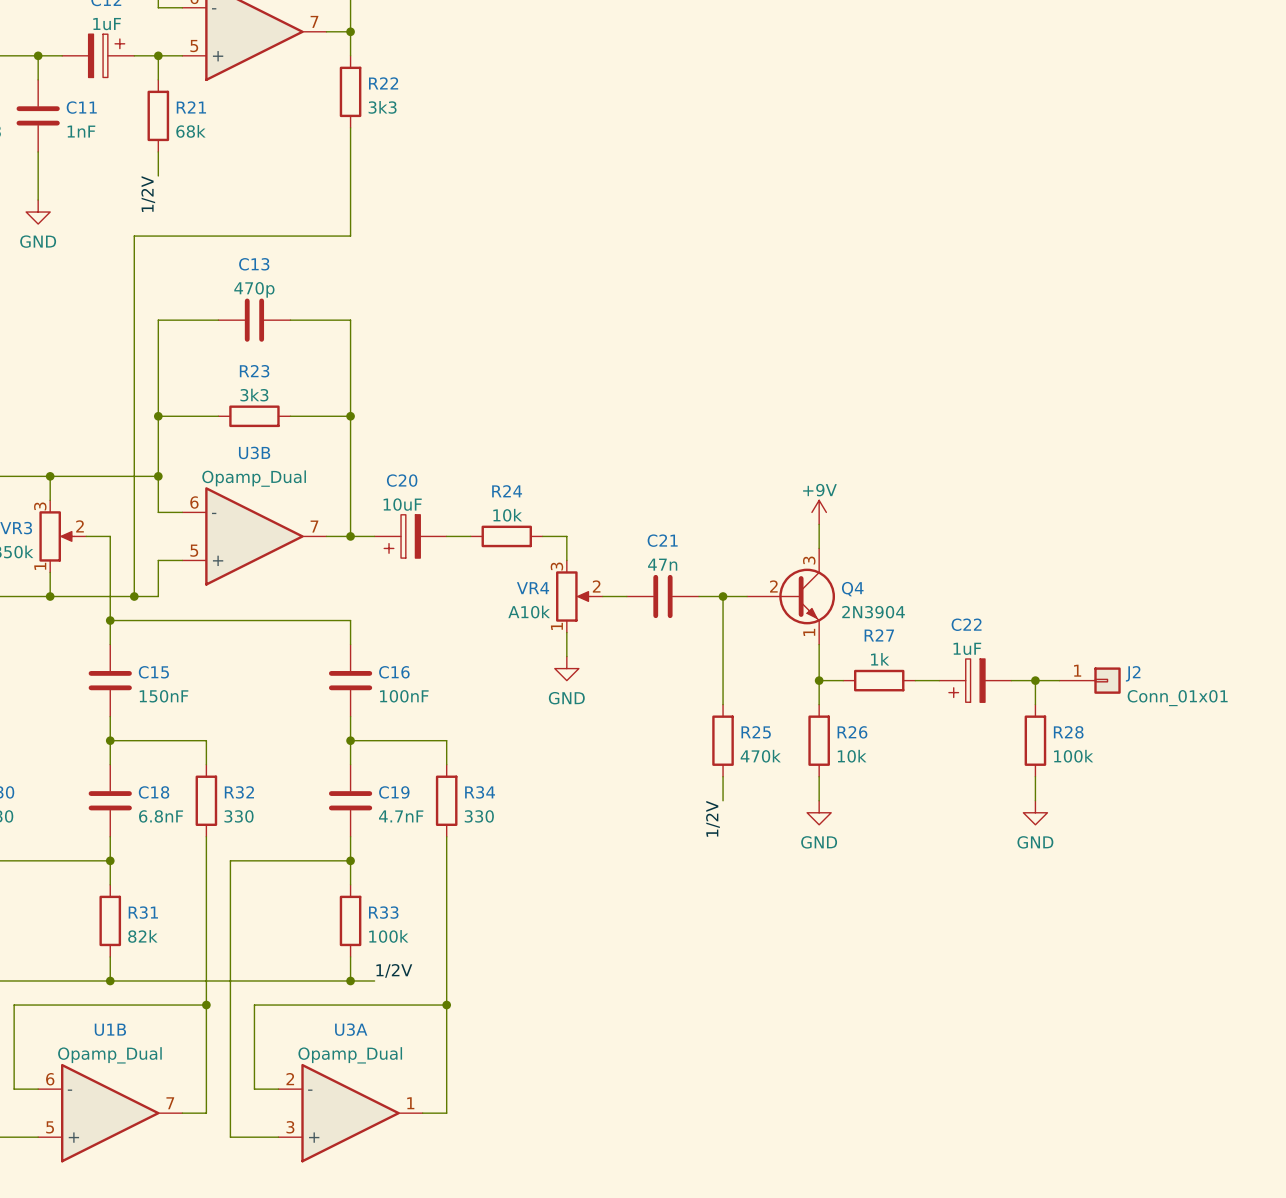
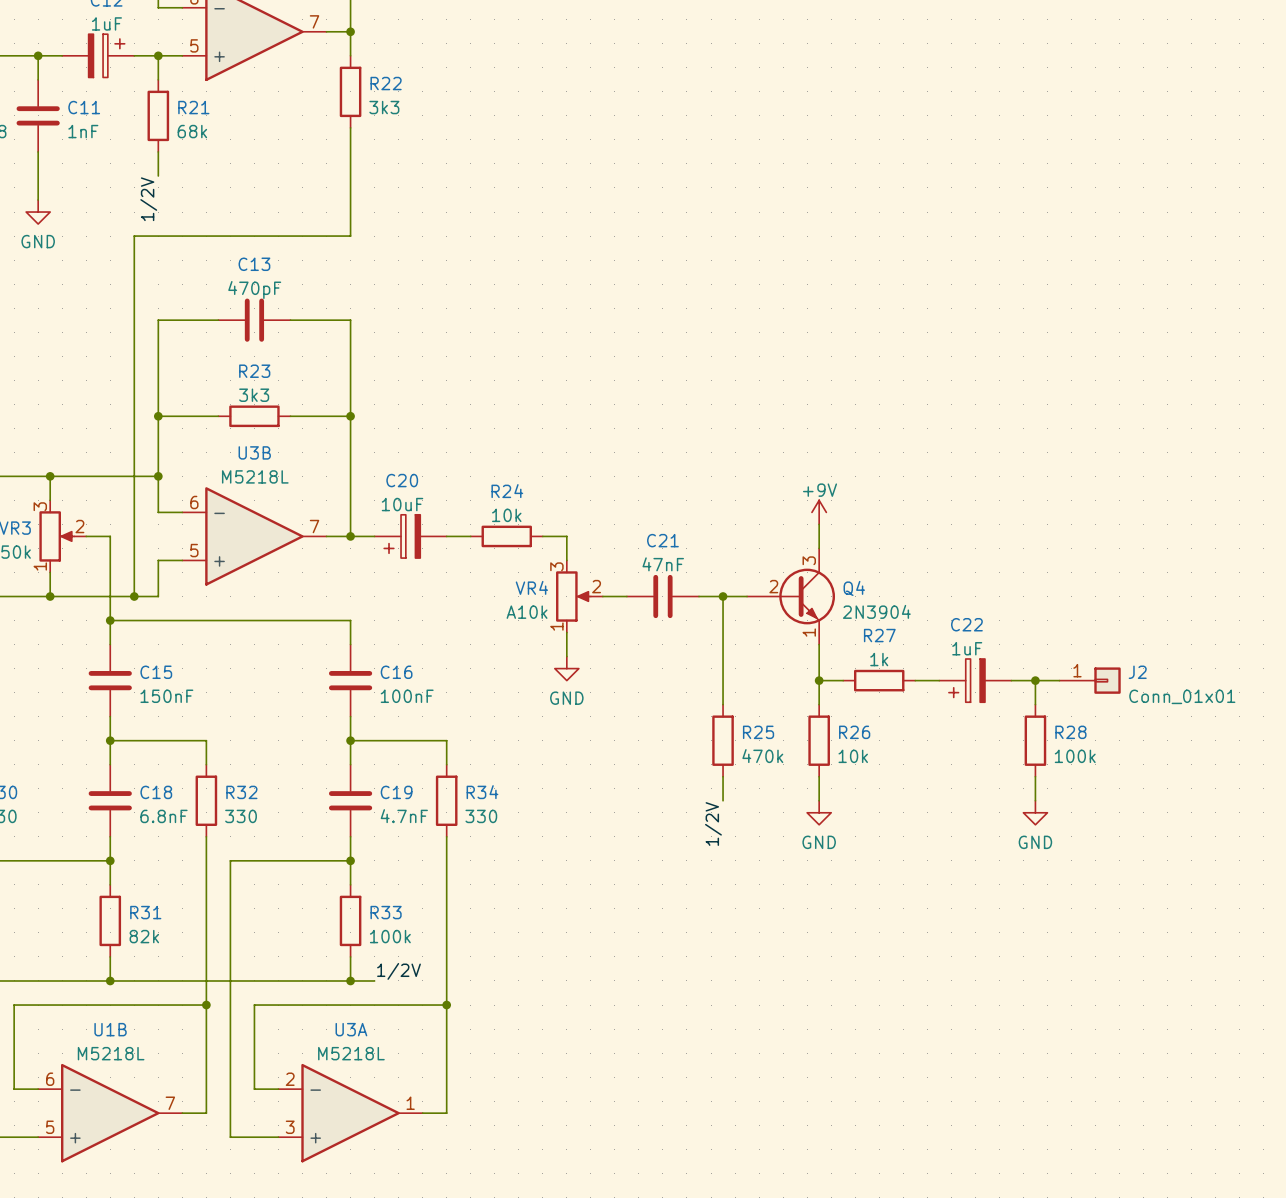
C13 value: 470p (254, 289) -> 470pF (254, 290)
U3B value: Opamp_Dual (254, 478) -> M5218L (255, 476)
C21 value: 47n (662, 564) -> 47nF (663, 564)
U1B value: Opamp_Dual (109, 1055) -> M5218L (111, 1053)
U3A value: Opamp_Dual (350, 1055) -> M5218L (351, 1053)

